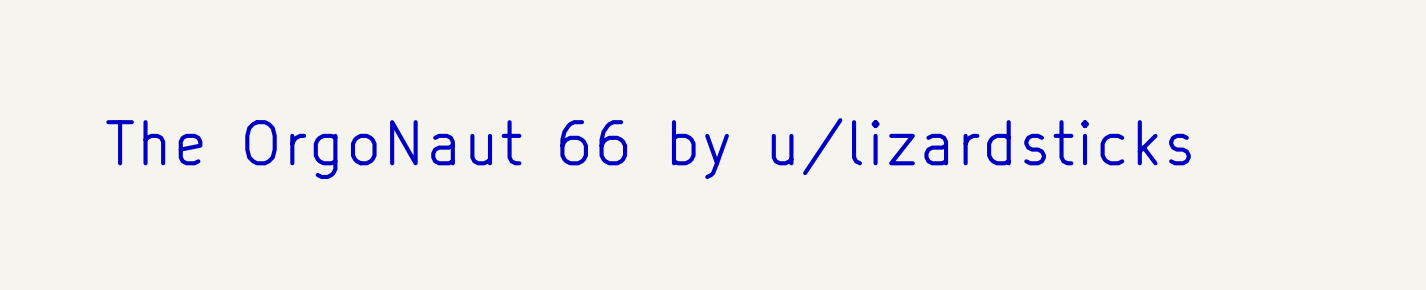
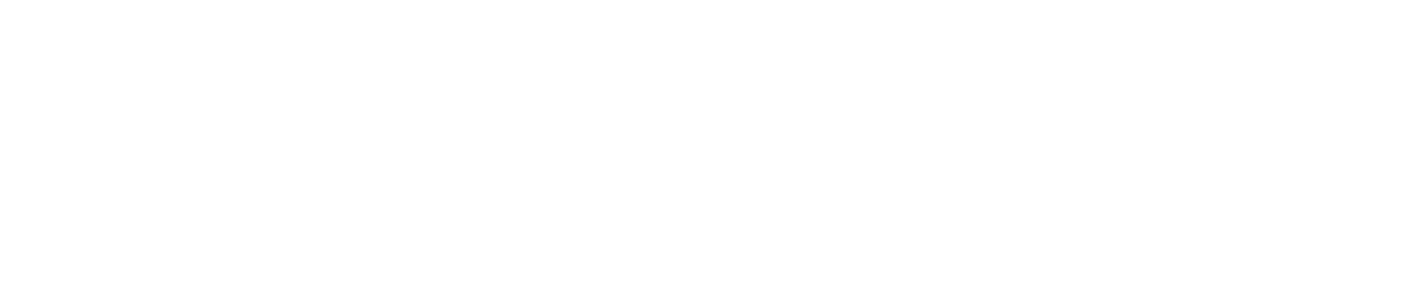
text: The OrgoNaut 66 by u/lizardsticks (648, 148) -> none

